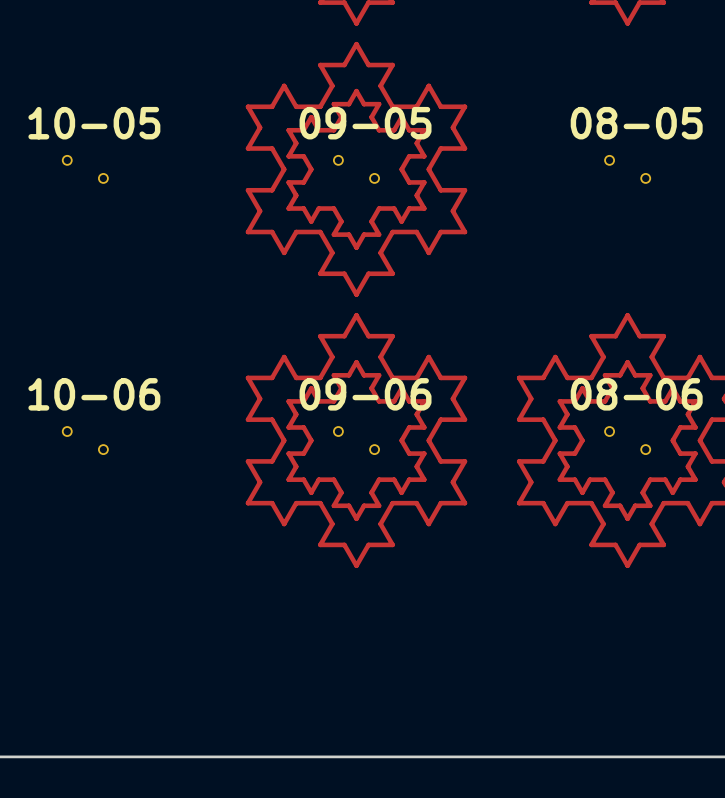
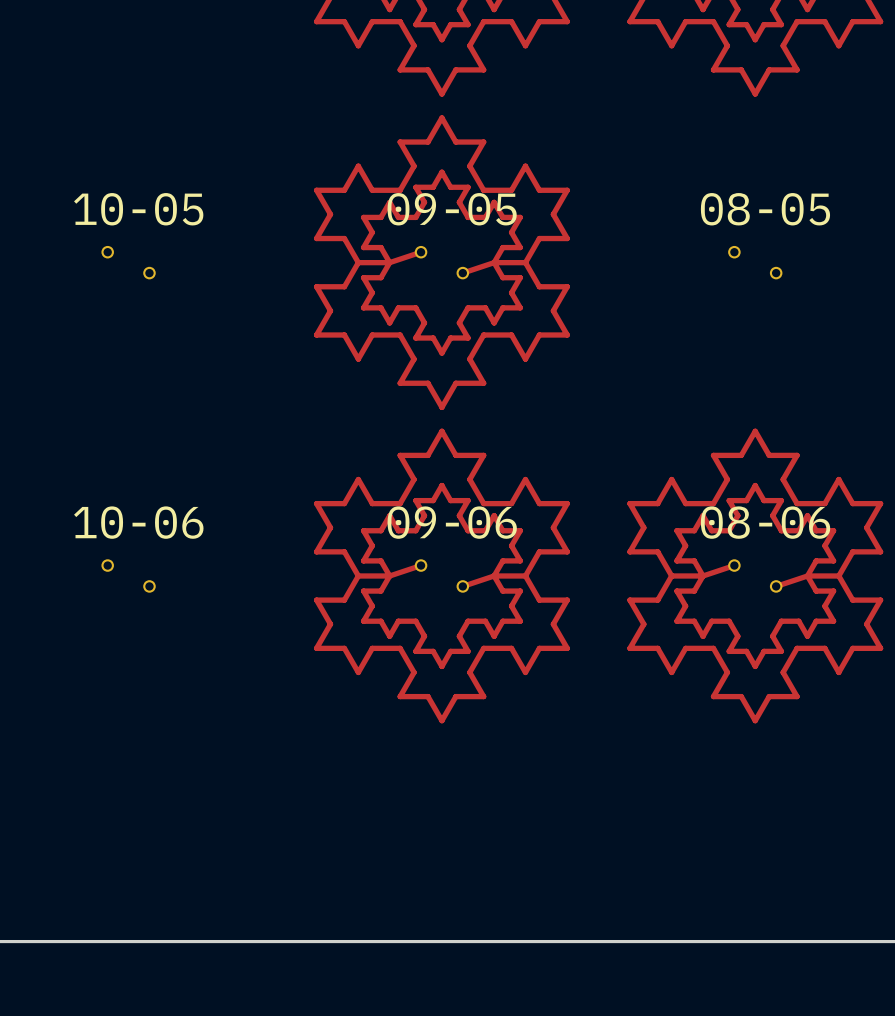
top track: none -> (421, 252) (389, 262) (358, 262)
top track: none -> (525, 262) (494, 262) (462, 273)
top track: none -> (421, 565) (389, 575) (358, 575)
top track: none -> (734, 565) (703, 575) (671, 575)
top track: none -> (525, 575) (494, 575) (462, 586)
top track: none -> (838, 575) (807, 575) (776, 586)

